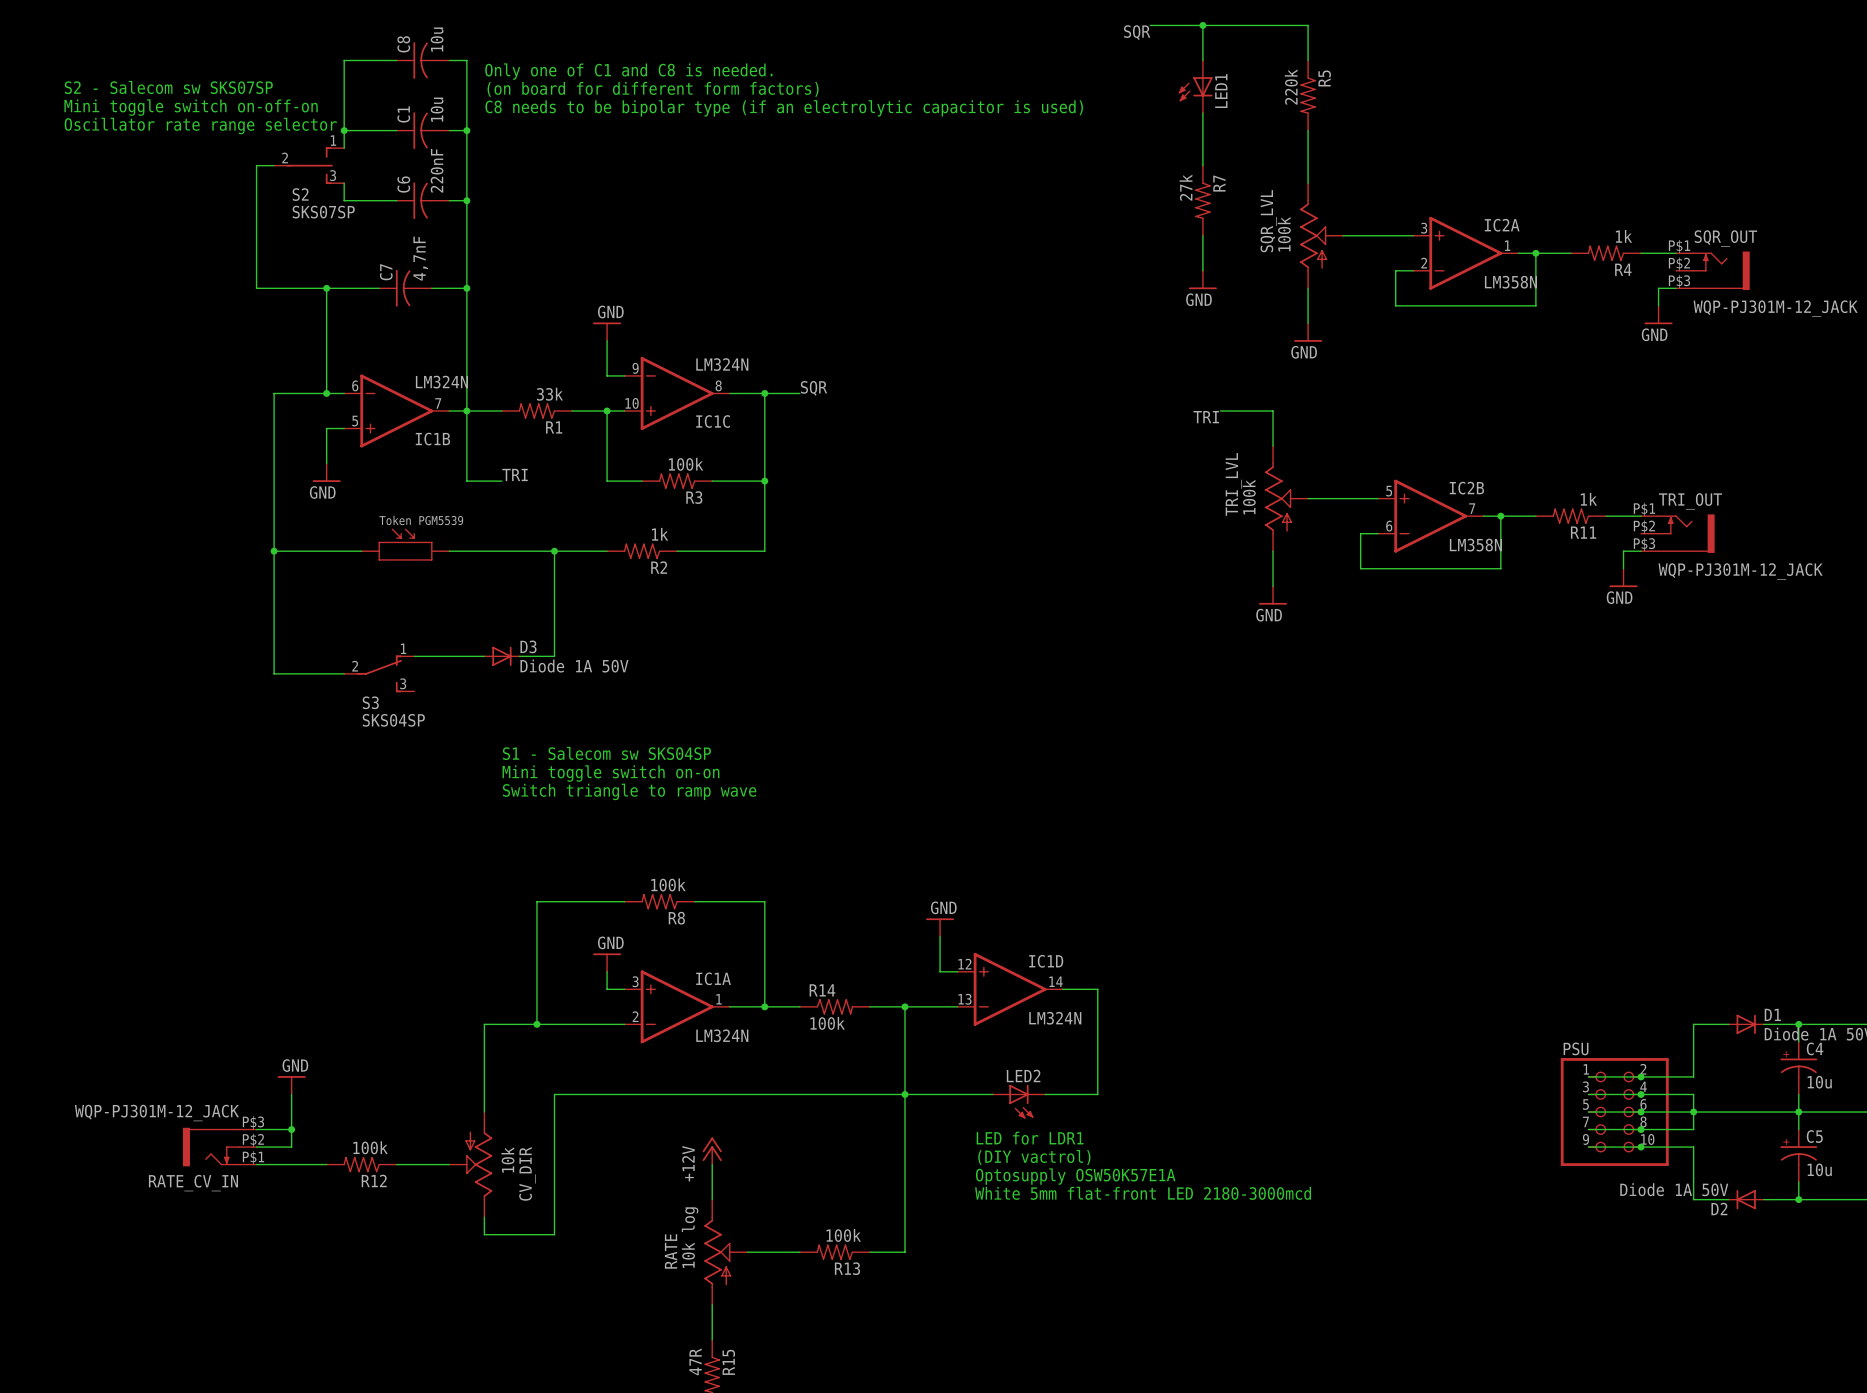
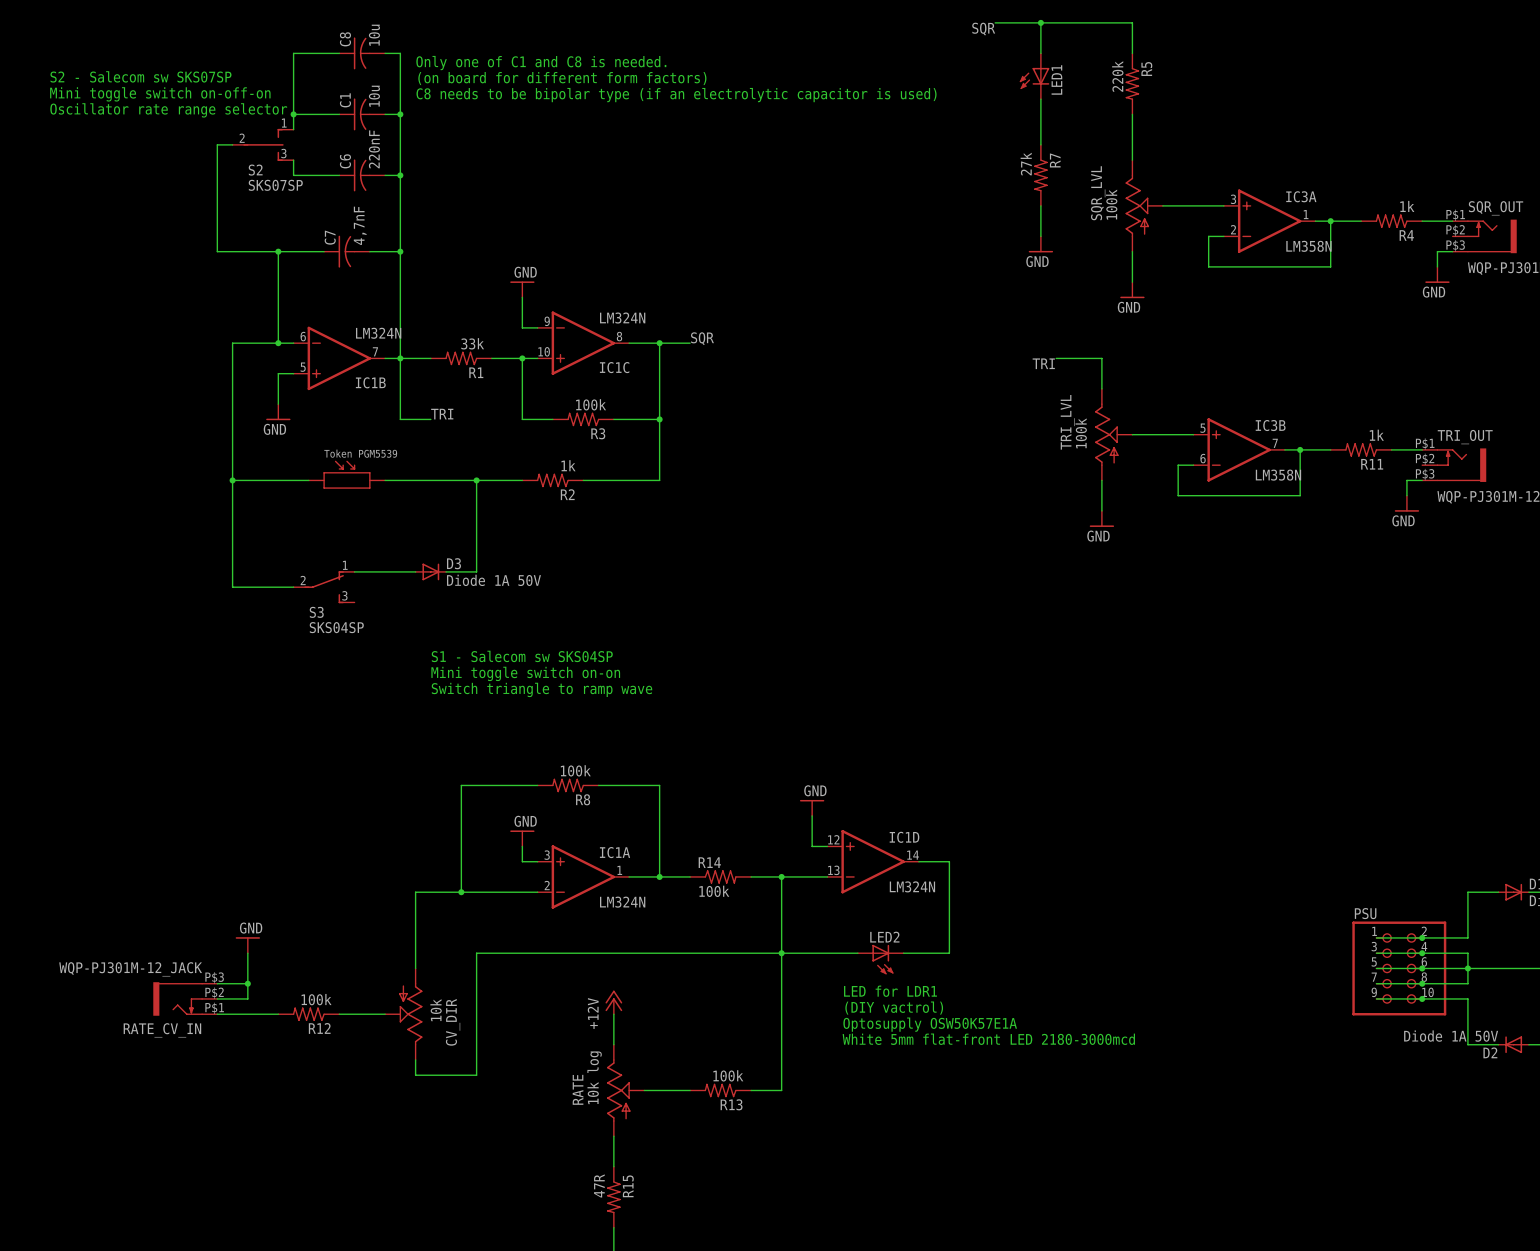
IC2A name: IC2A (1502, 225) -> IC3A (1301, 196)
IC2B name: IC2B (1466, 488) -> IC3B (1270, 425)

